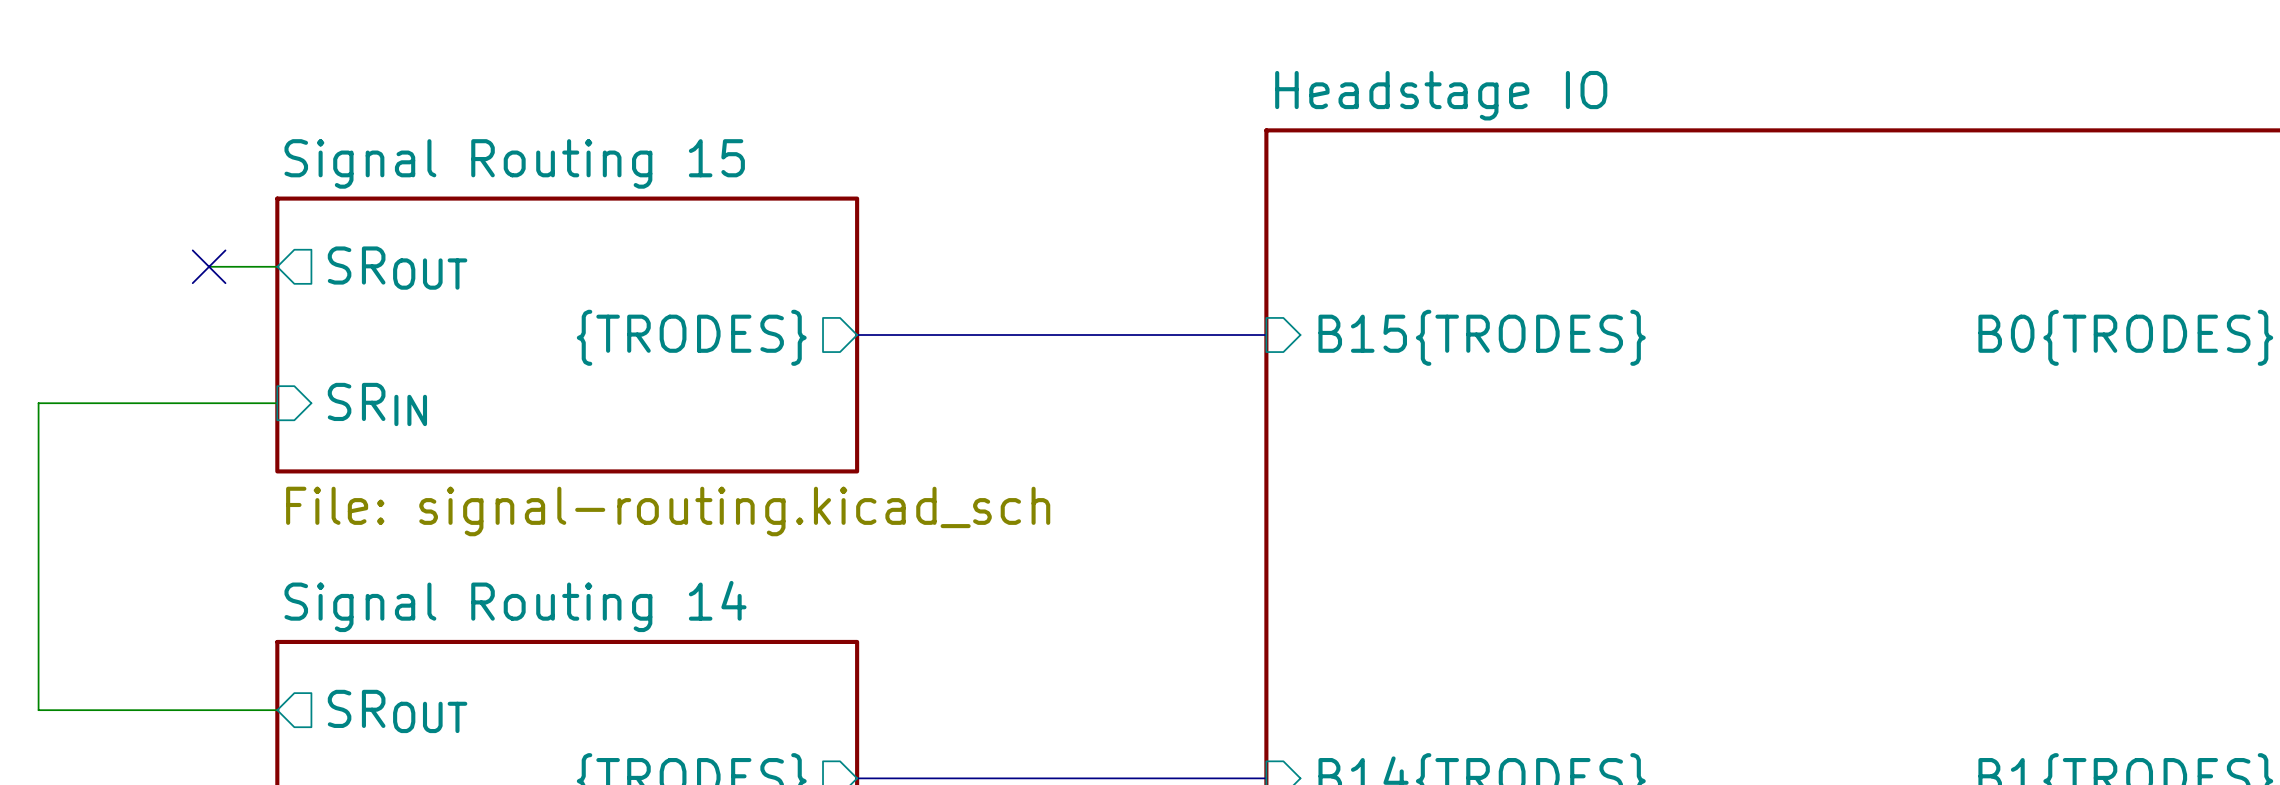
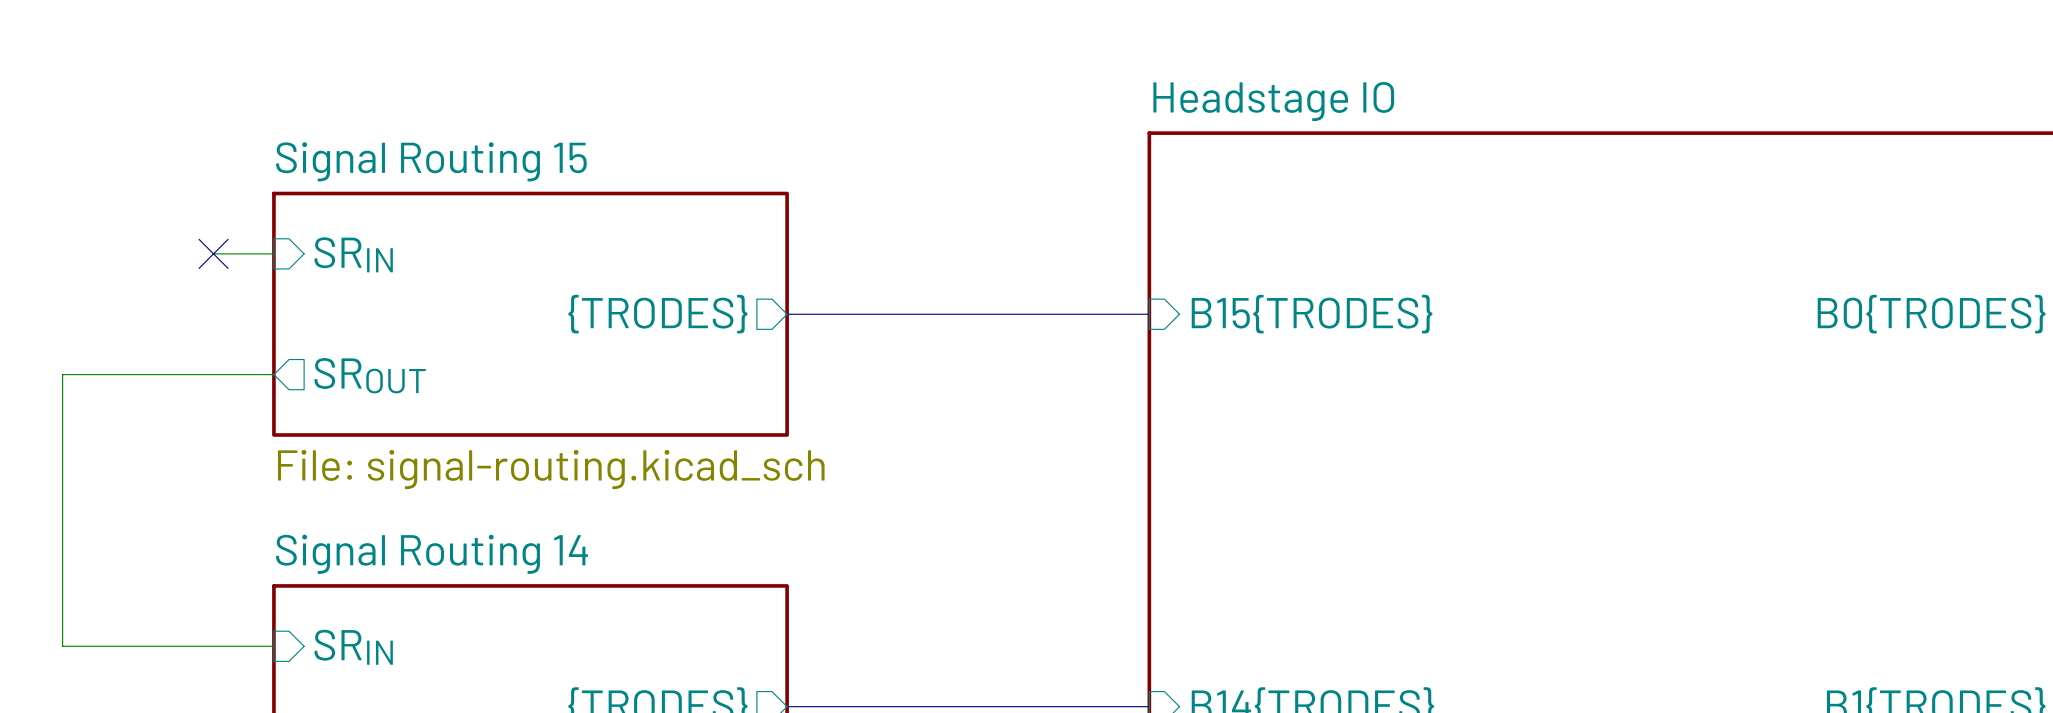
sheet pin shape: output (397, 268) -> input (353, 254)
sheet pin: SROUT (397, 268) -> SRIN (353, 254)
sheet pin shape: input (377, 404) -> output (370, 375)
sheet pin: SRIN (377, 404) -> SROUT (370, 375)
sheet pin shape: output (397, 711) -> input (353, 647)
sheet pin: SROUT (397, 711) -> SRIN (353, 647)

